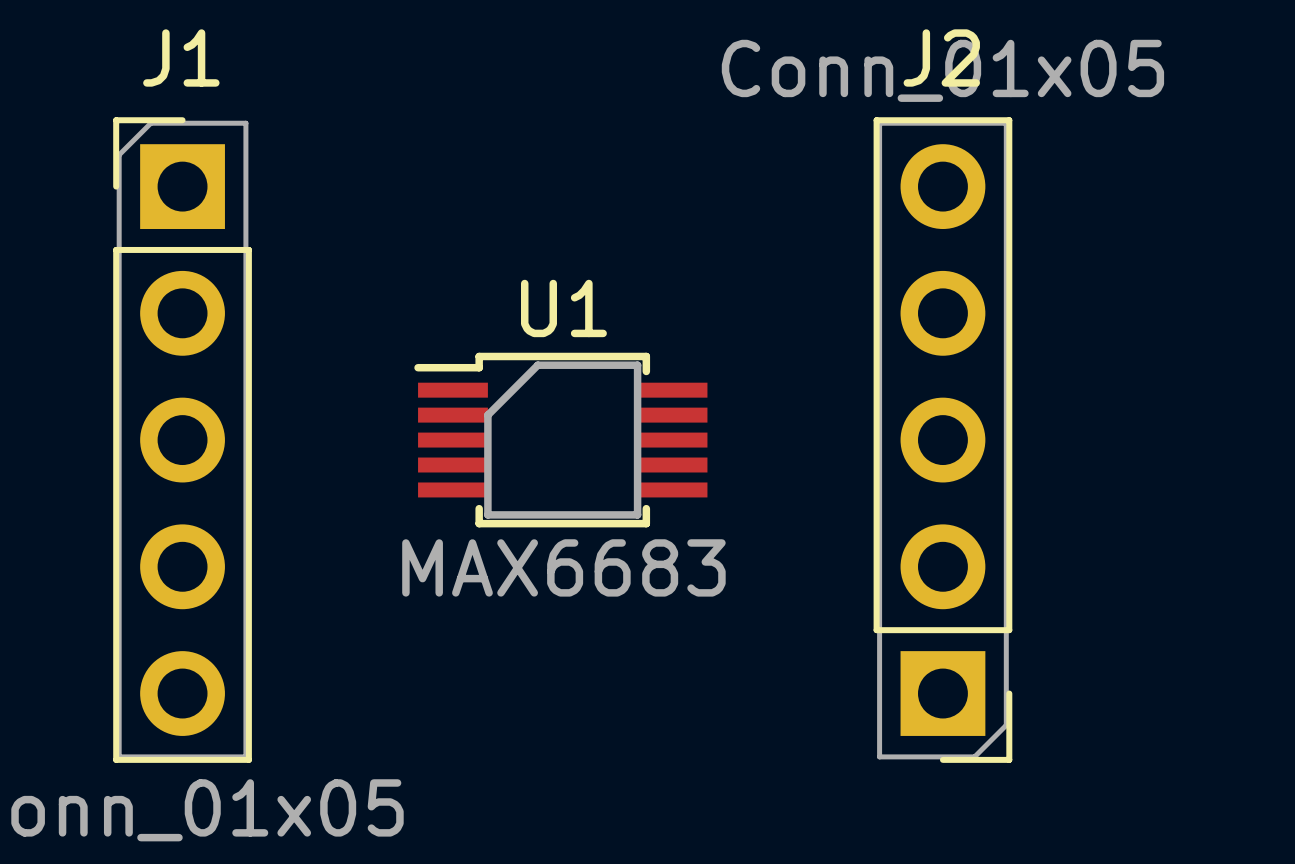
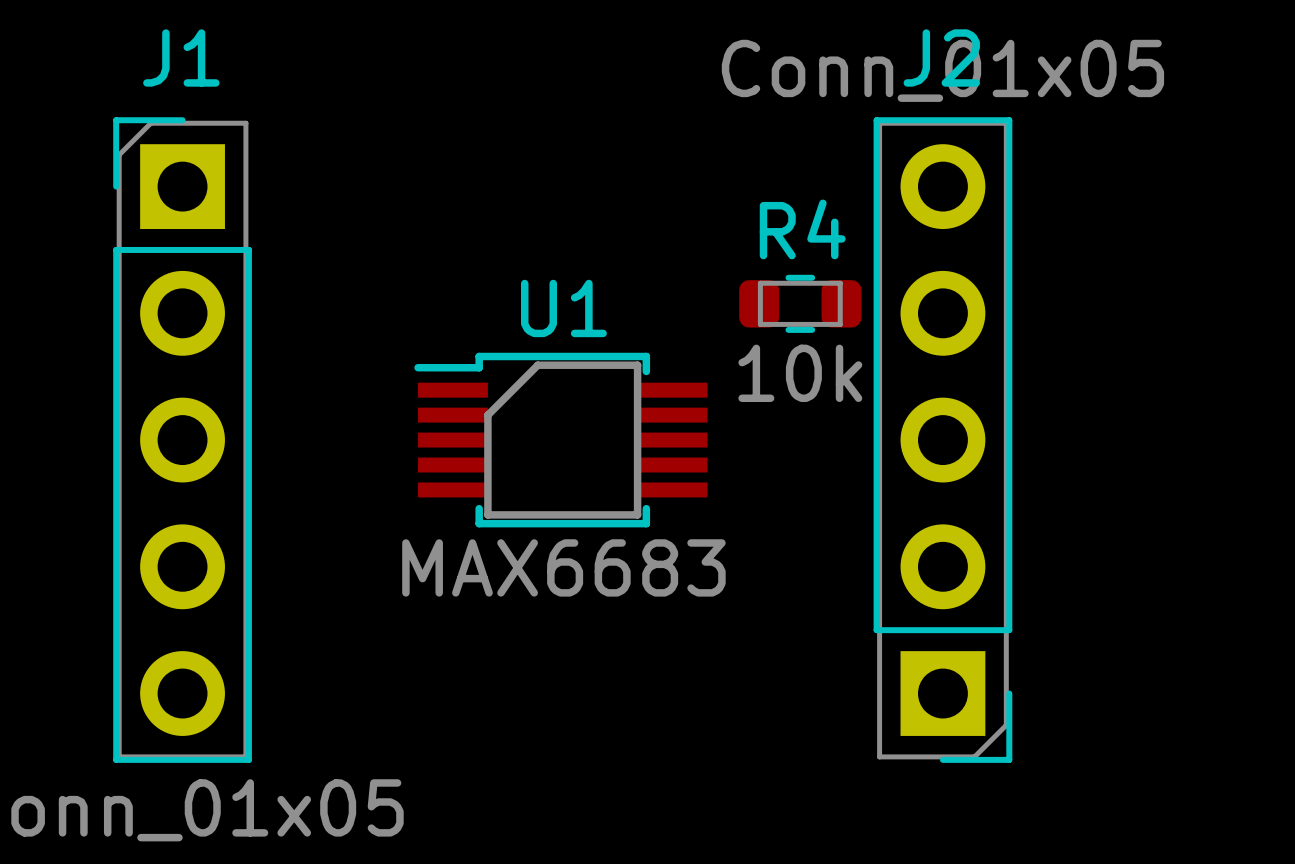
R4: none -> 10k (800, 303)

